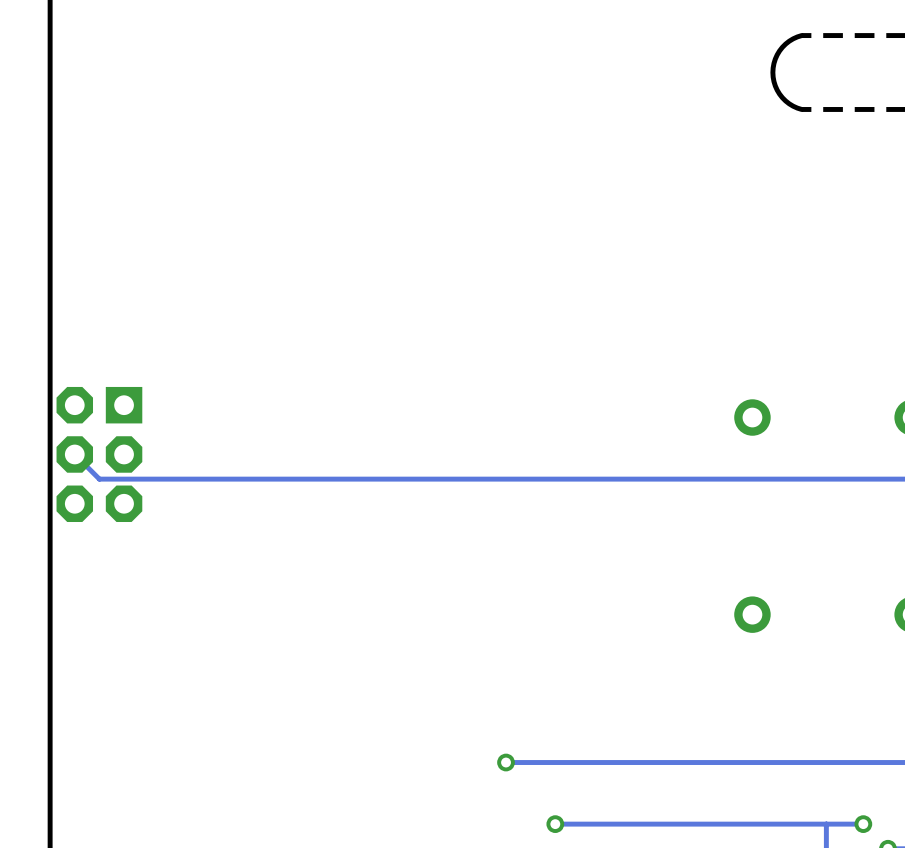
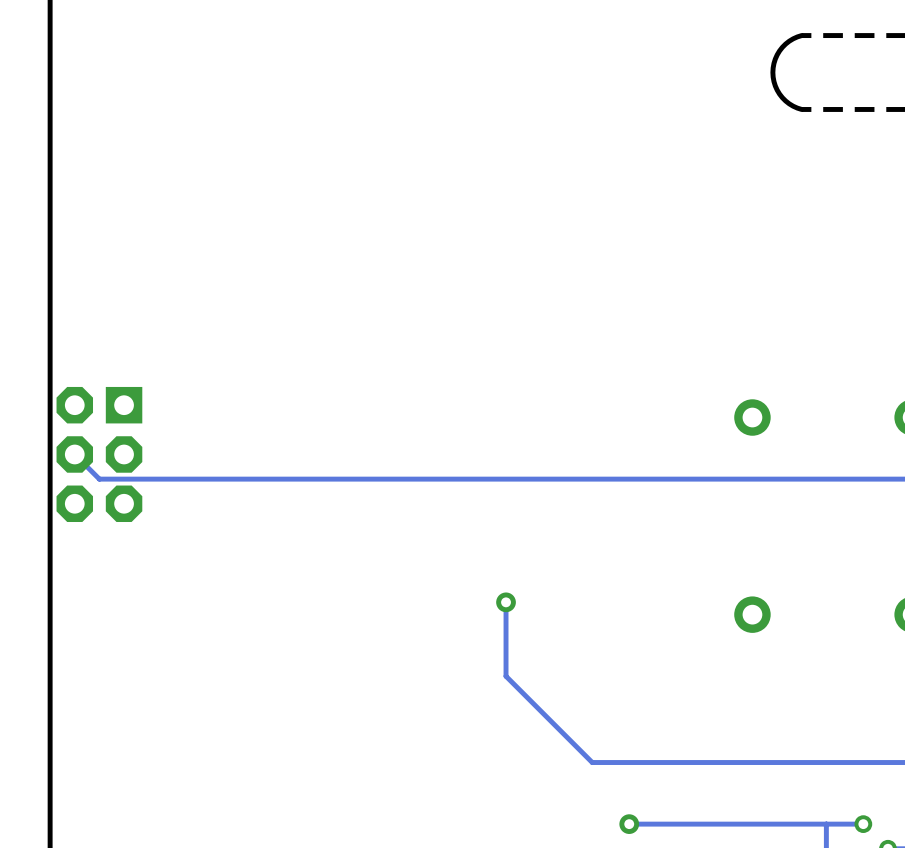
via: none -> (506, 602)
via: (506, 762) -> none
track: (592, 762) (506, 762) -> (592, 762) (506, 676) (506, 602)
via: (555, 824) -> none
track: (629, 824) (555, 824) -> none
via: none -> (629, 824)

